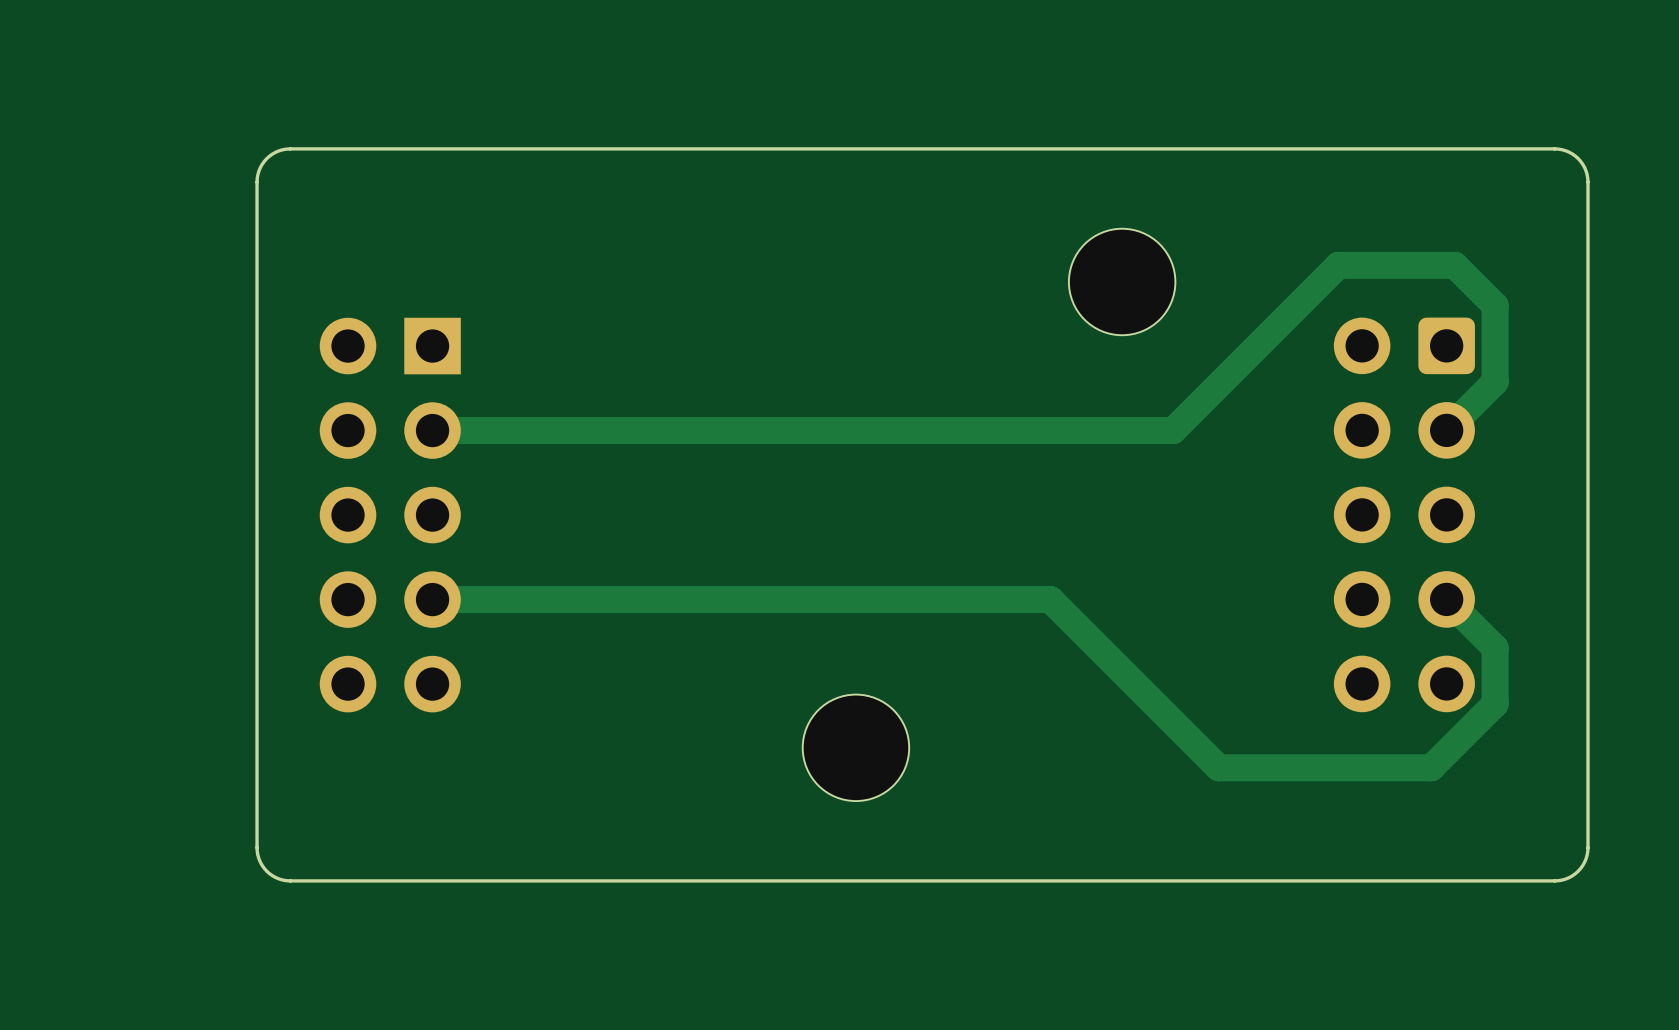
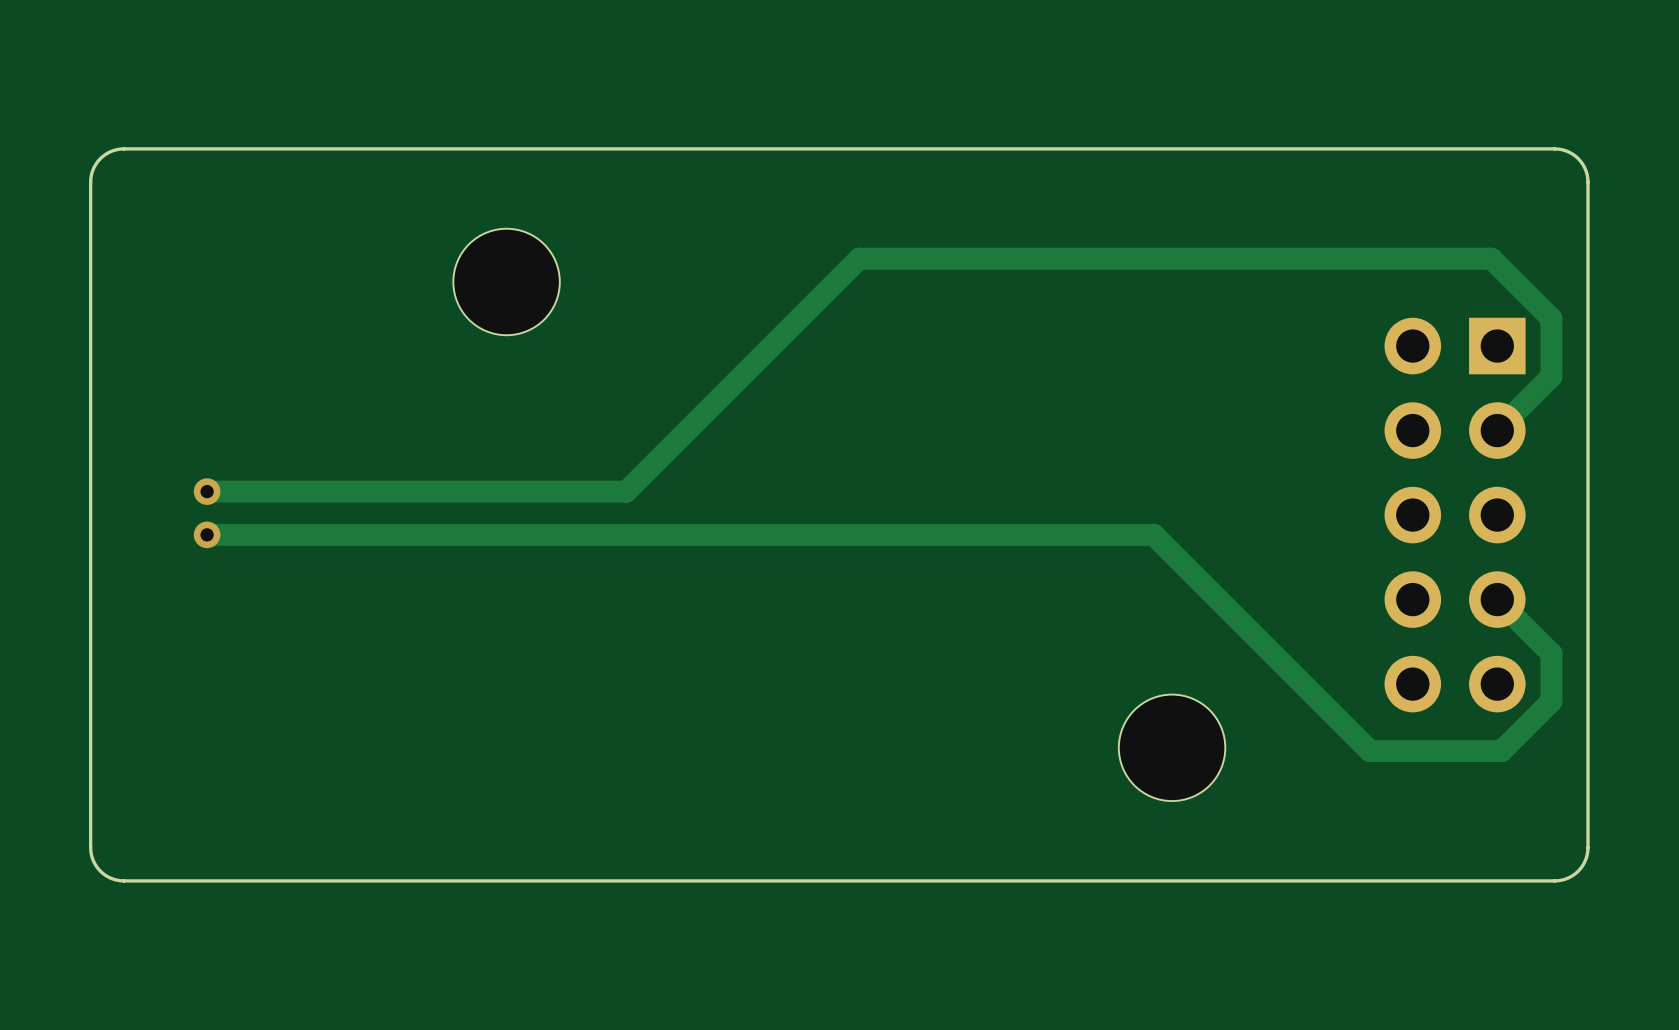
board edge: (290, 148) (279, 150) (266, 158) (260, 167) (257, 182) (257, 847) (258, 858) (266, 871) (275, 877) (290, 880) -> (290, 148) (120, 149) (109, 152) (100, 158) (93, 167) (90, 182) (91, 855) (100, 871) (109, 877) (120, 880) (290, 880)
part: none -> (506, 281)
part: (1122, 281) -> none
track: (1446, 430) (1495, 381) (1495, 305) (1454, 265) (1338, 265) (1173, 430) (432, 430) -> none
track: none -> (1497, 430) (1551, 376) (1551, 318) (1491, 258) (859, 258) (626, 491) (207, 491)
via: none -> (207, 491)
part: (1404, 514) -> none
part: (390, 515) -> none
part: none -> (1455, 515)
track: none -> (207, 534) (1153, 534) (1370, 751) (1501, 751) (1551, 701) (1551, 653) (1497, 599)
via: none -> (207, 534)
track: (1446, 599) (1495, 647) (1495, 704) (1431, 767) (1218, 767) (1050, 599) (432, 599) -> none
part: (855, 747) -> none
part: none -> (1172, 747)

